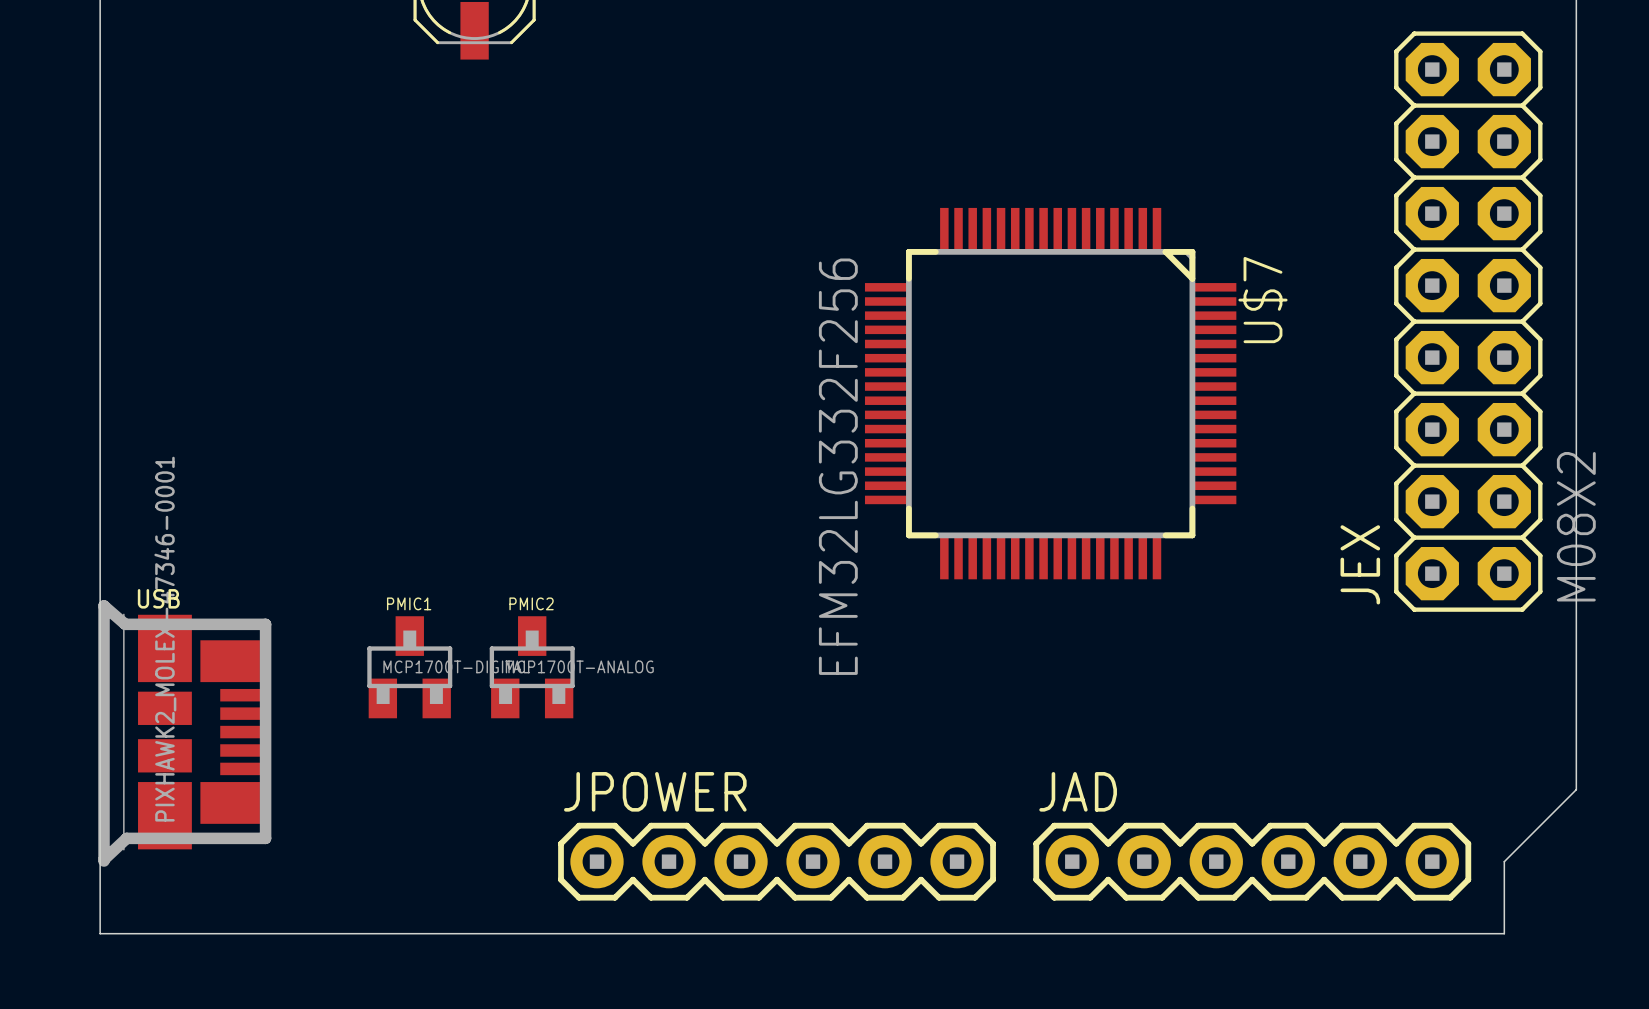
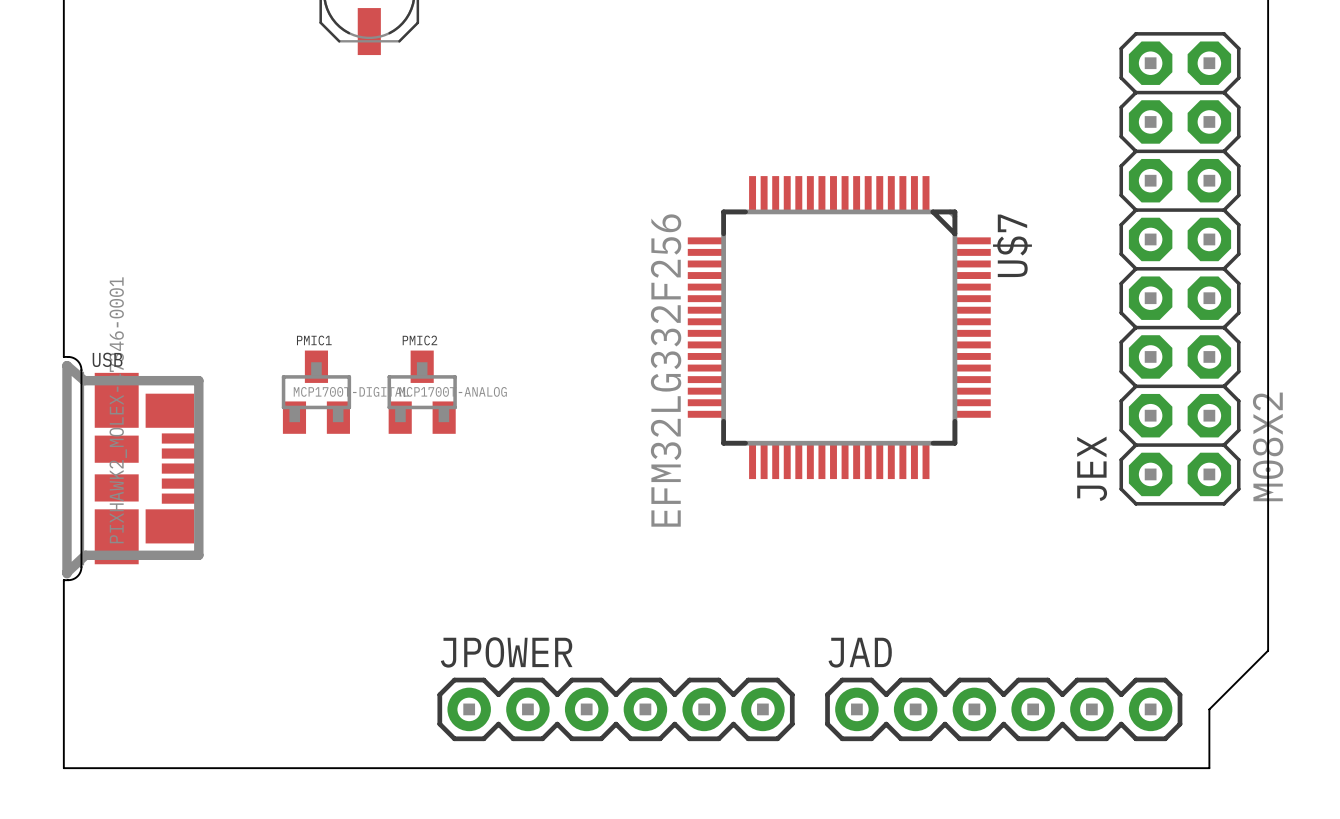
board edge: (100, 429) (100, 703) -> (63, 356) (76, 359) (81, 370) (81, 568) (74, 578) (63, 580)
PMIC1 position: (409, 667) -> (316, 392)
PMIC2 position: (532, 667) -> (422, 392)
USB position: (184, 733) -> (132, 469)

